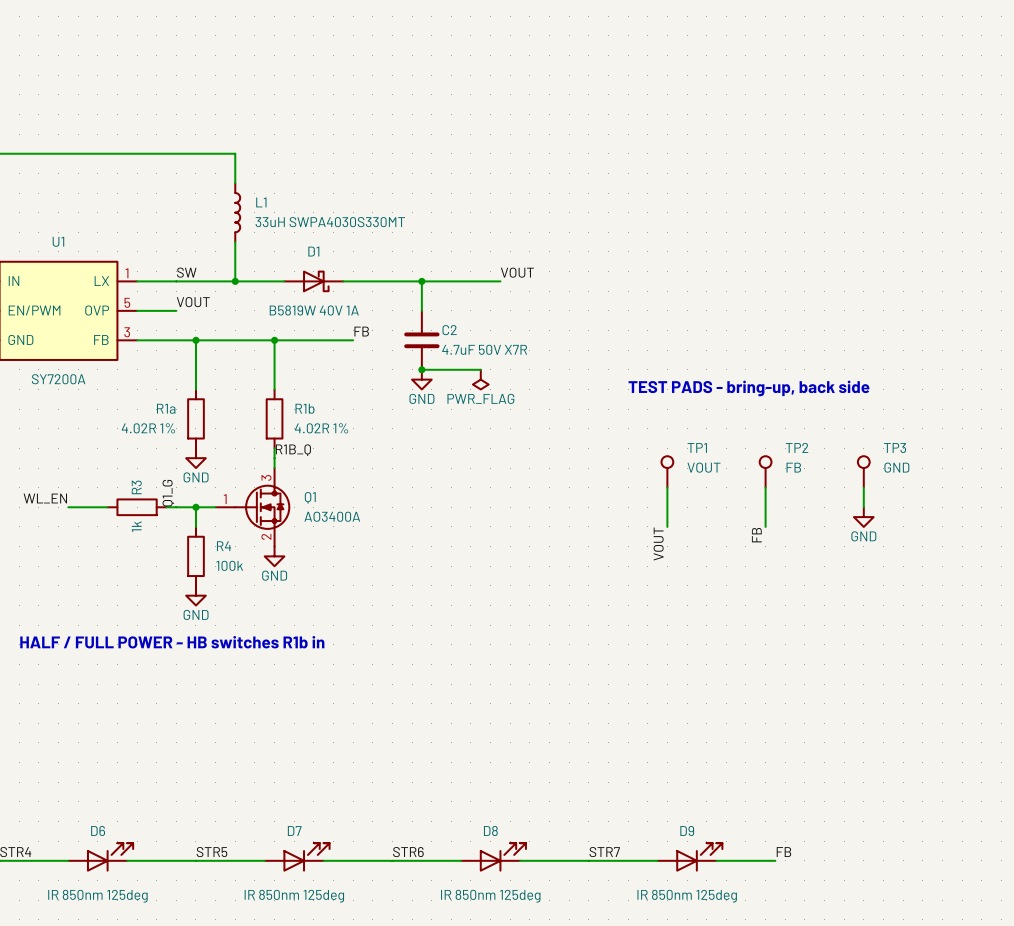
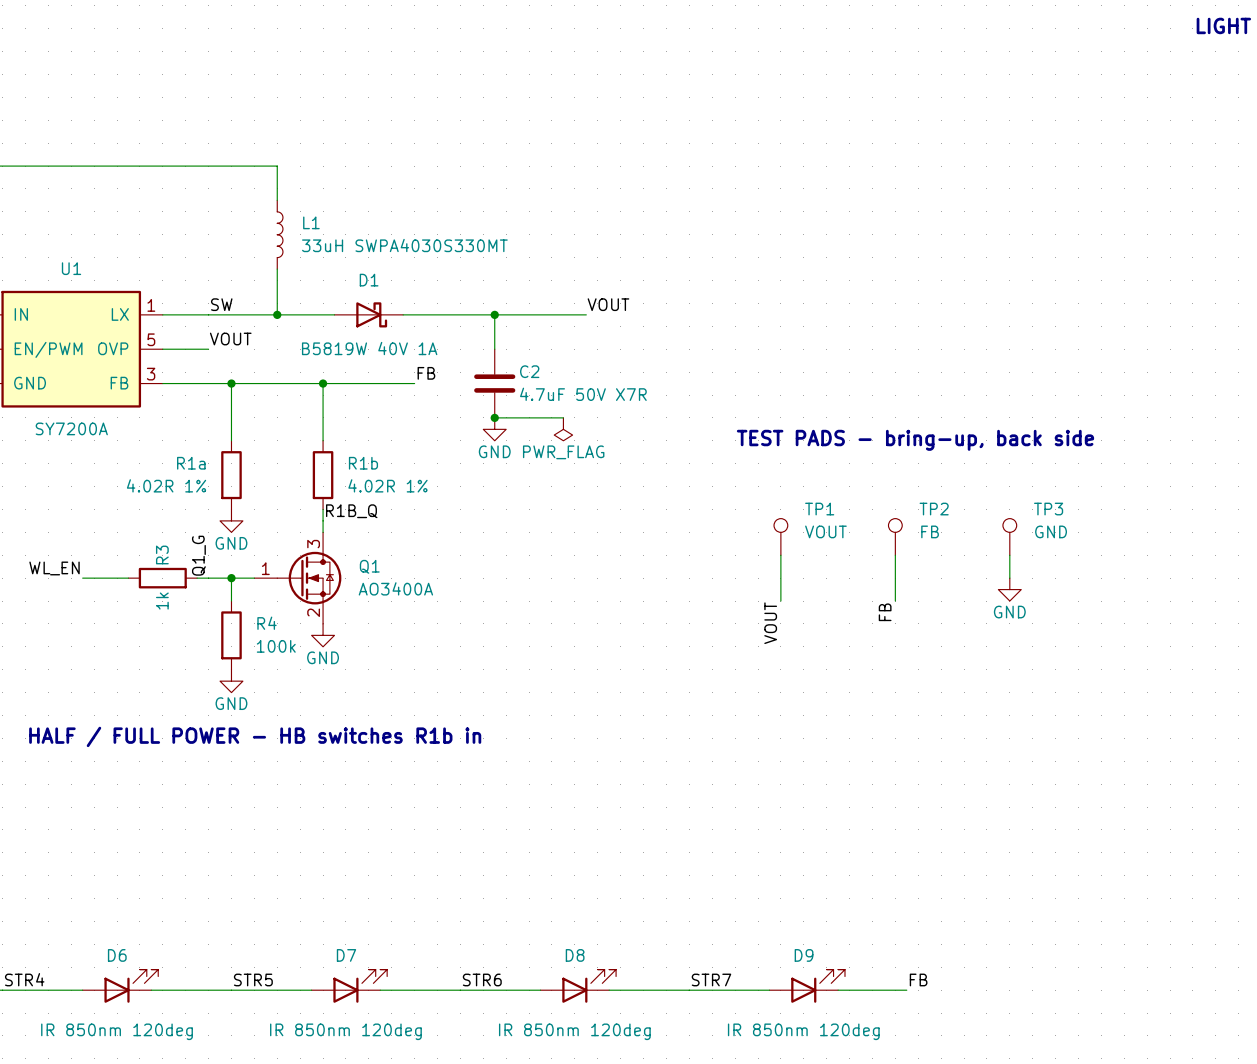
D6 value: IR 850nm 125deg (97, 896) -> IR 850nm 120deg (117, 1031)
D7 value: IR 850nm 125deg (294, 896) -> IR 850nm 120deg (345, 1031)
D8 value: IR 850nm 125deg (490, 896) -> IR 850nm 120deg (574, 1031)
D9 value: IR 850nm 125deg (687, 896) -> IR 850nm 120deg (803, 1031)

